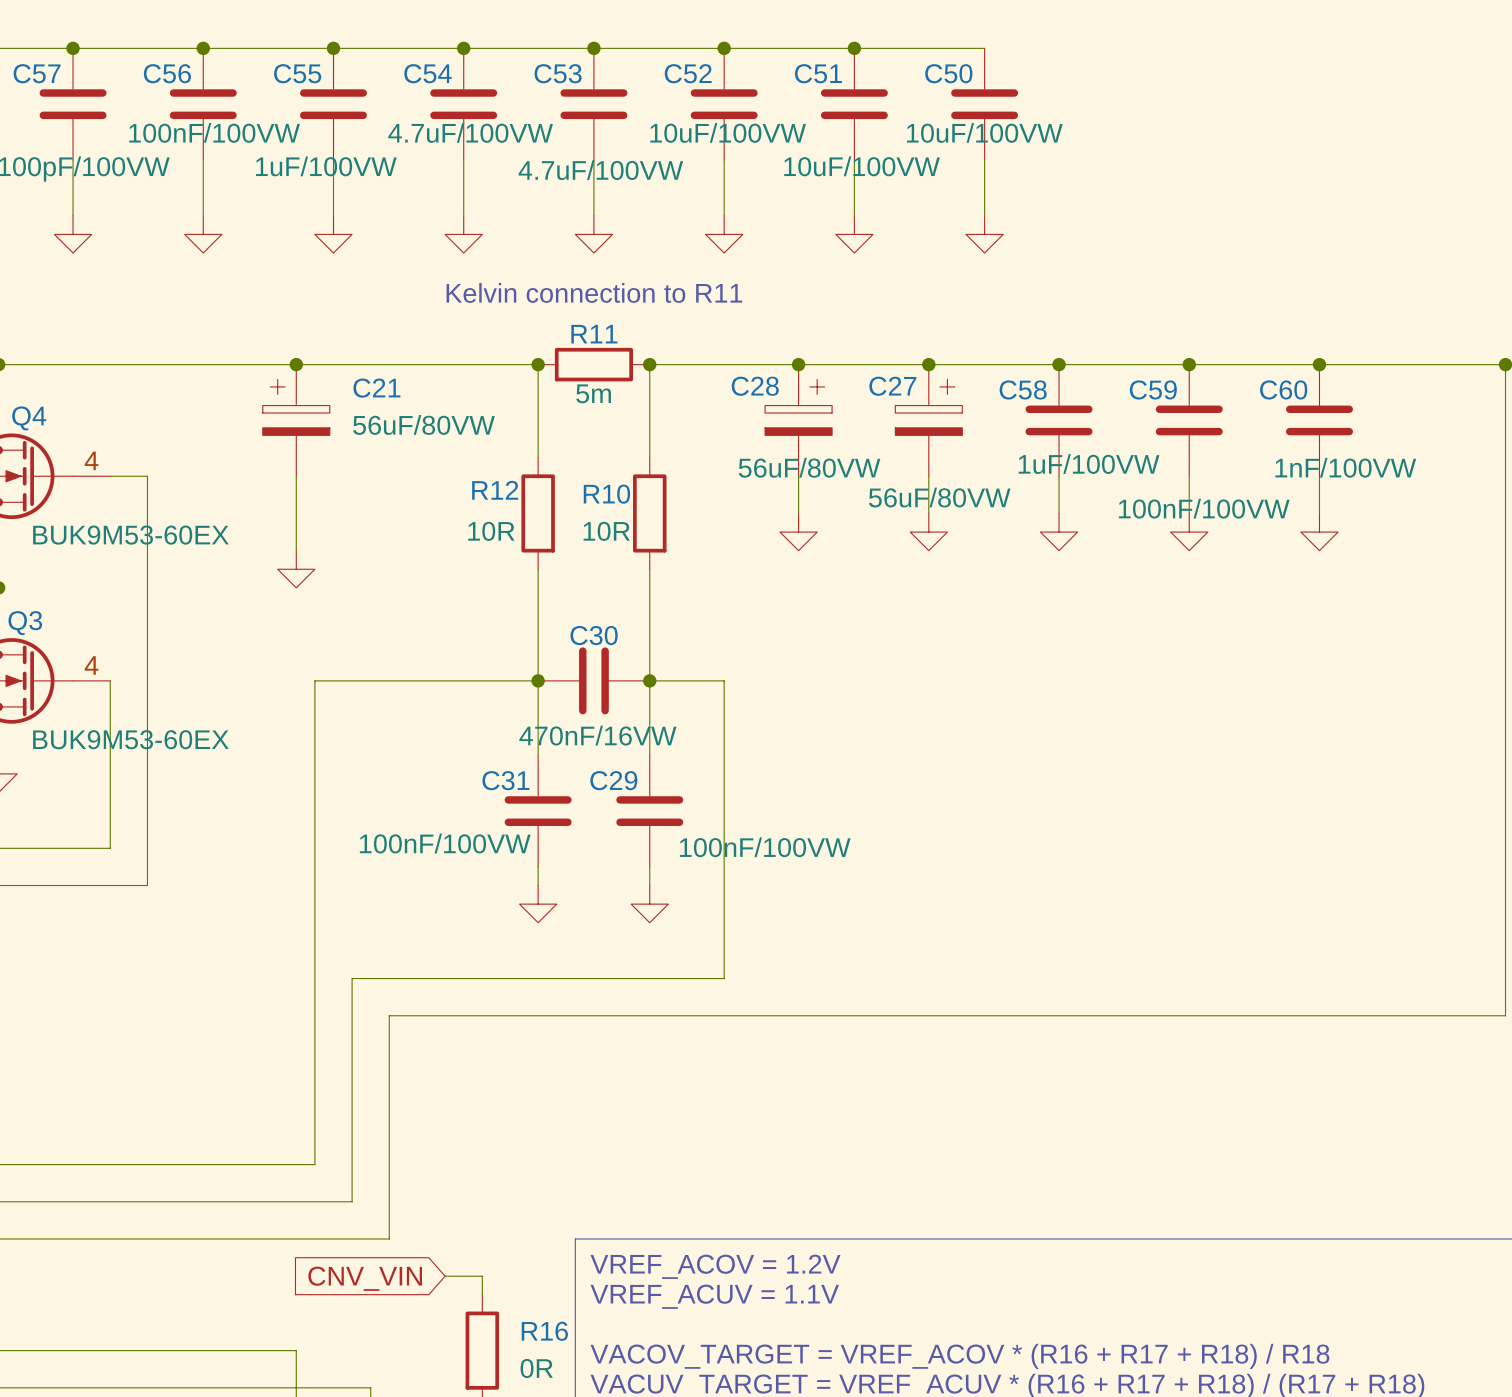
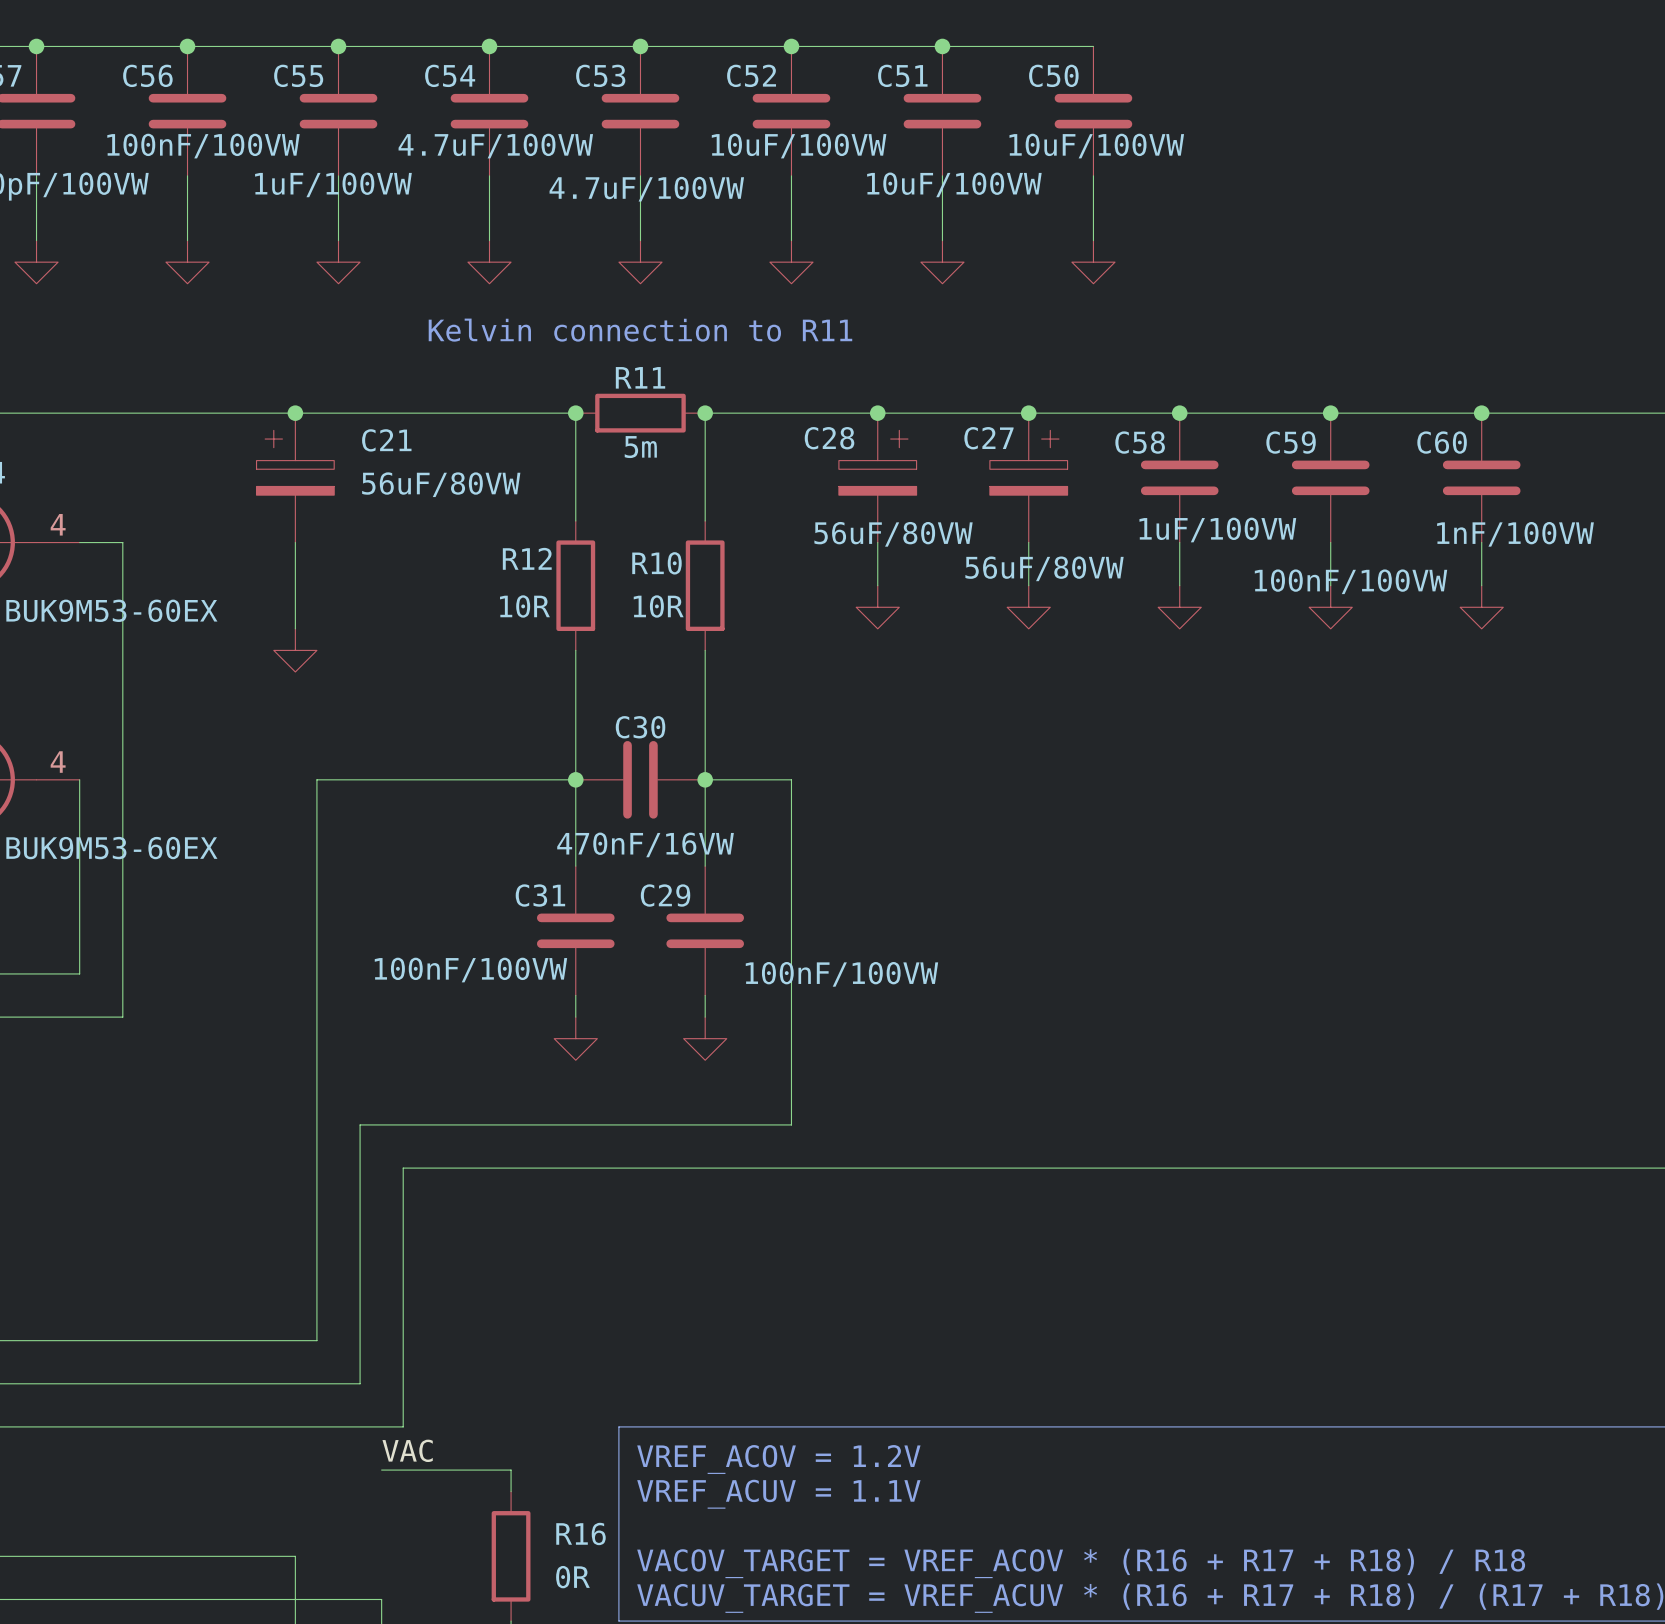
label: none -> VAC (407, 1450)
wire: none -> (381, 1470) (467, 1470)
global label: CNV_VIN (365, 1278) -> none

